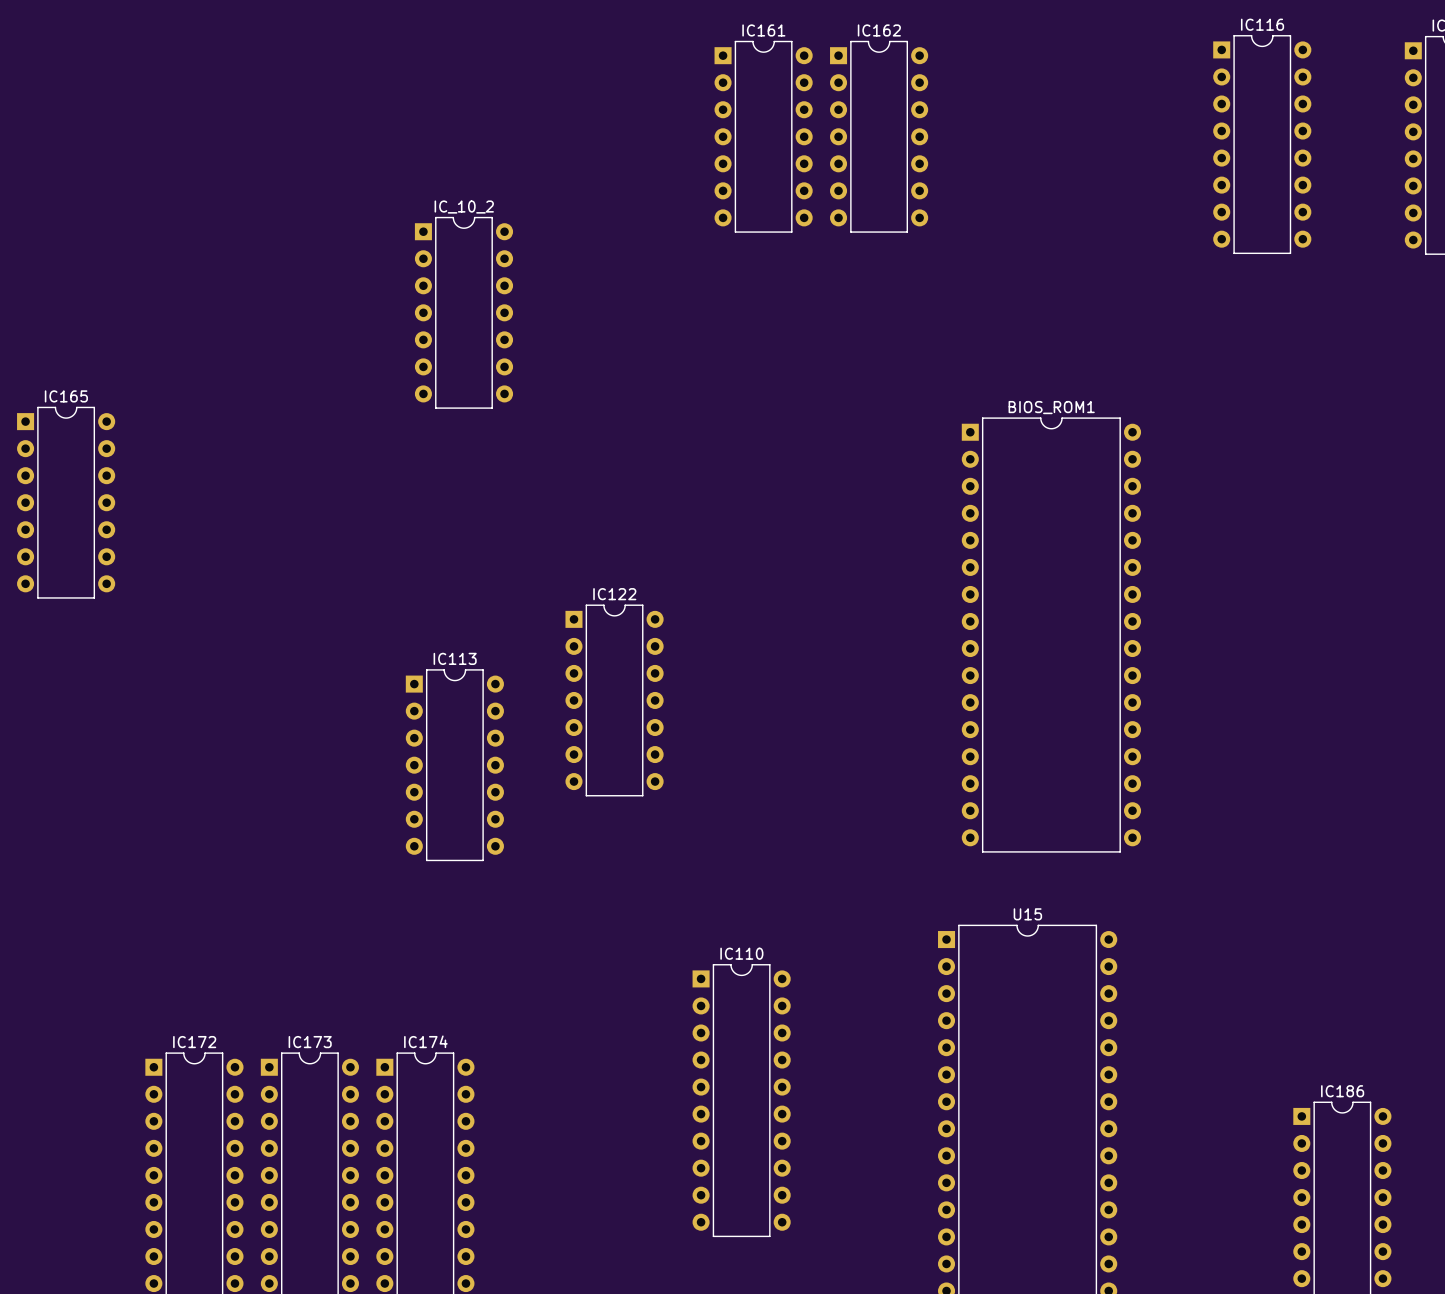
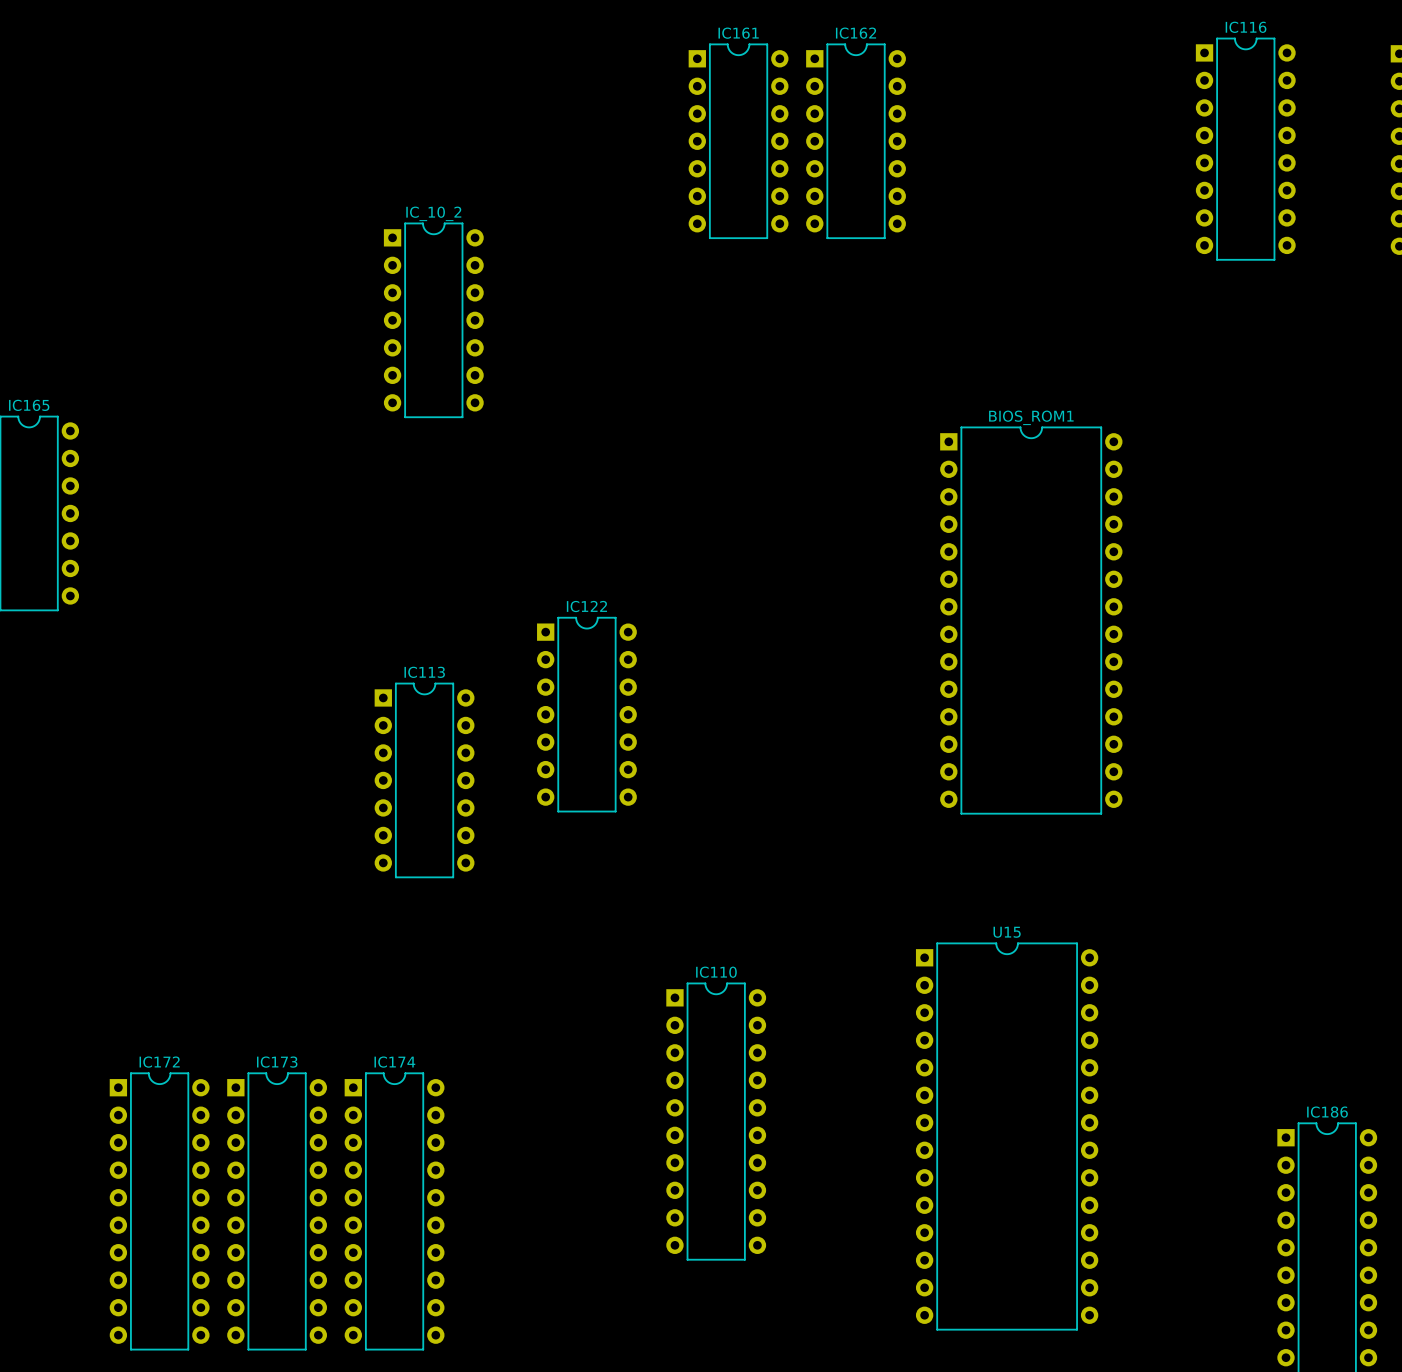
BIOS_ROM1 footprint: [961, 417, 1142, 853] -> [940, 426, 1123, 815]

